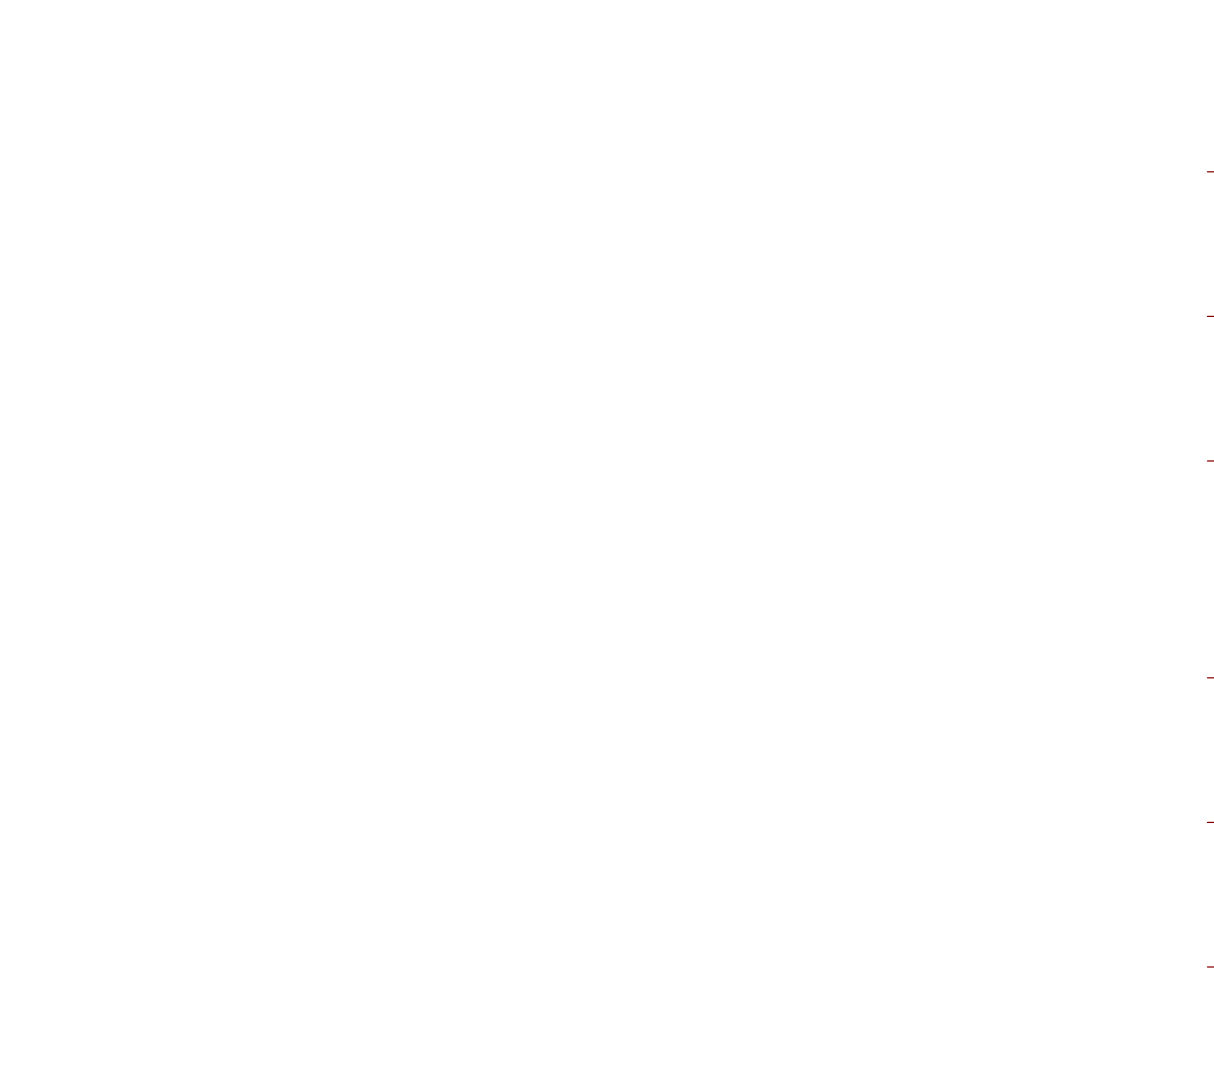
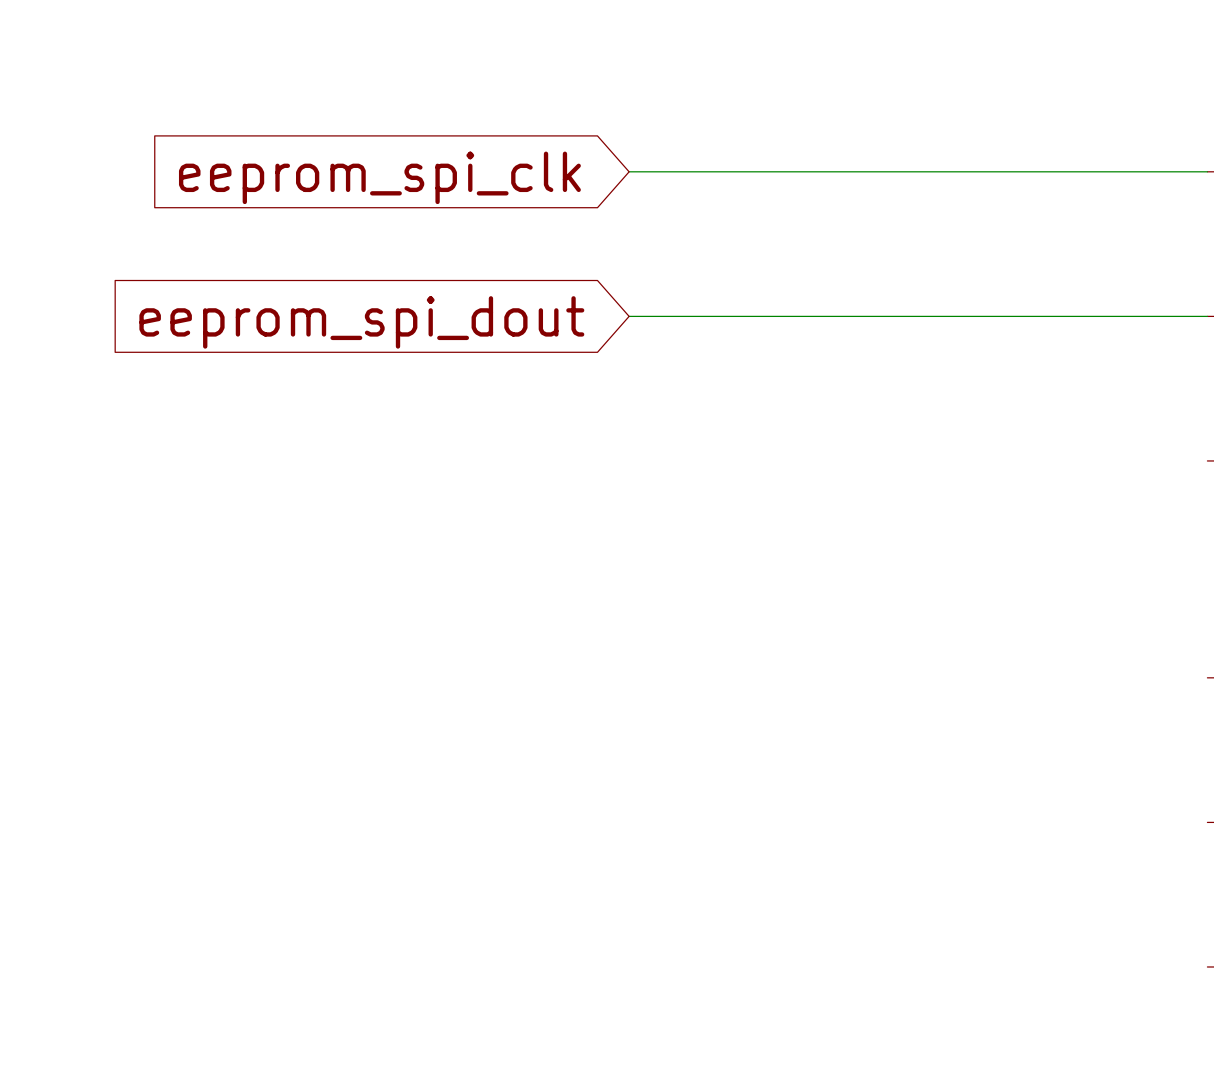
wire: none -> (629, 171) (1207, 171)
global label: none -> eeprom_spi_clk (379, 177)
wire: none -> (629, 316) (1207, 316)
global label: none -> eeprom_spi_dout (361, 322)

